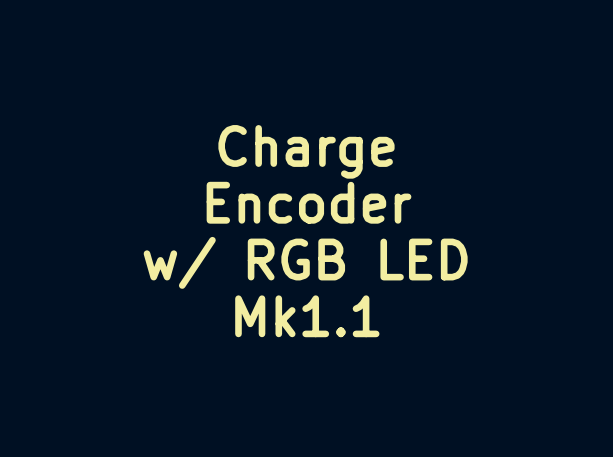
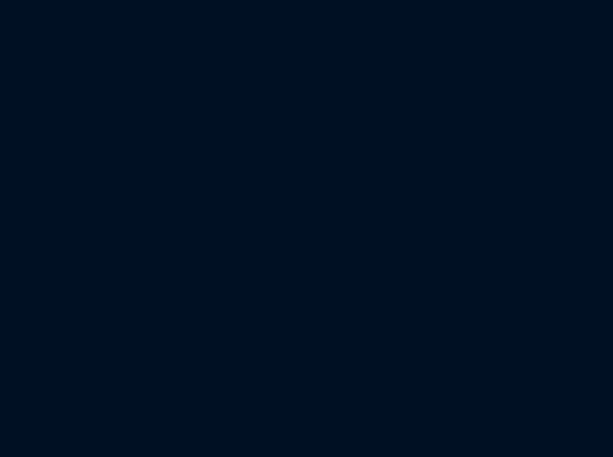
text: Charge (306, 151) -> none
text: Encoder (309, 202) -> none
text: w/ RGB LED (305, 262) -> none
text: Mk1.1 (307, 316) -> none

